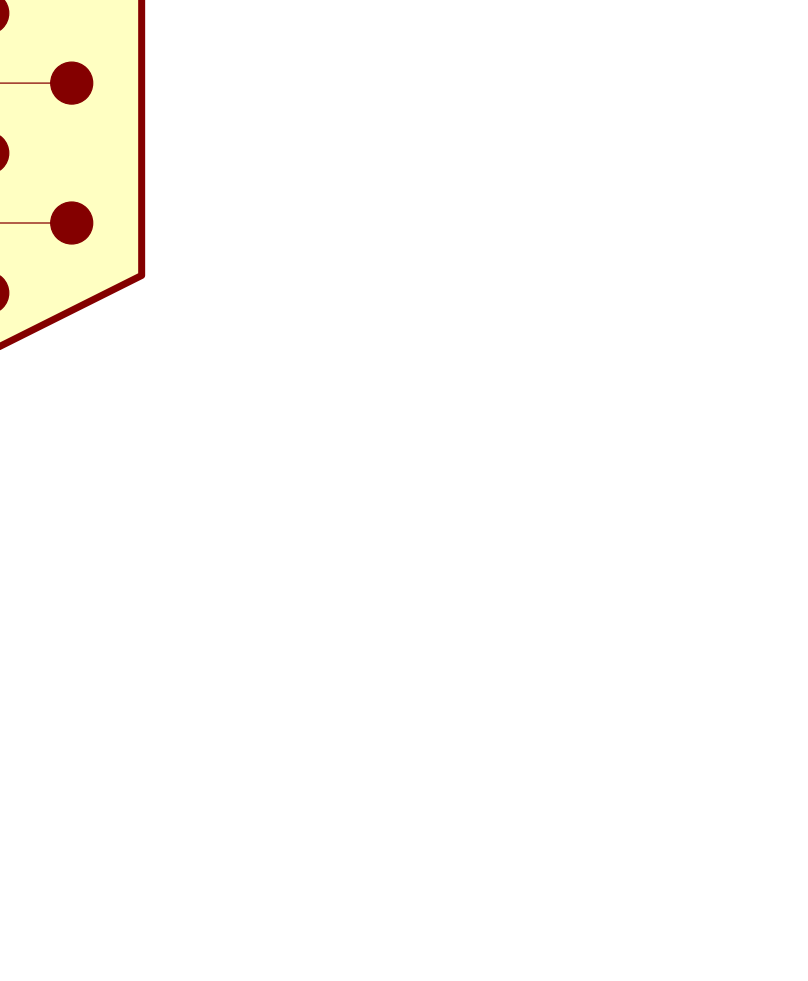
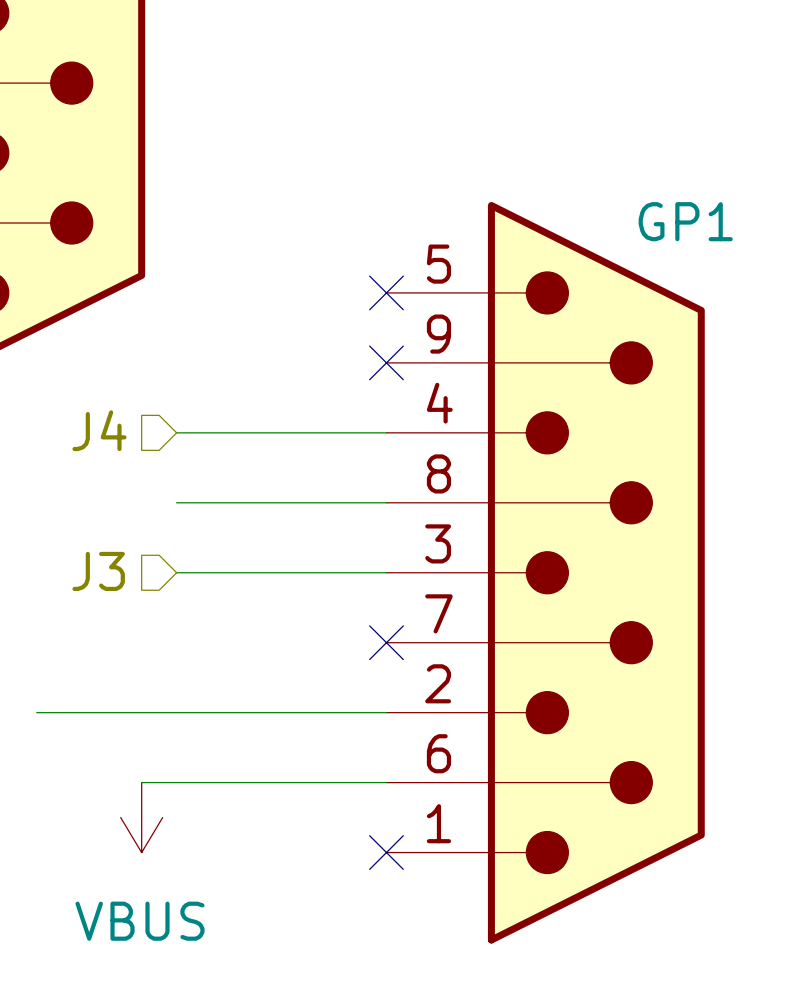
no-connect mark: none -> (386, 292)
no-connect mark: none -> (386, 362)
hierarchical label: none -> J4 (99, 430)
wire: none -> (176, 432) (386, 432)
wire: none -> (176, 502) (386, 502)
hierarchical label: none -> J3 (98, 571)
wire: none -> (176, 572) (386, 572)
GP1: none -> (545, 572)
no-connect mark: none -> (386, 642)
wire: none -> (36, 712) (386, 712)
wire: none -> (141, 782) (386, 782)
power symbol: none -> VBUS (141, 817)
no-connect mark: none -> (386, 852)

